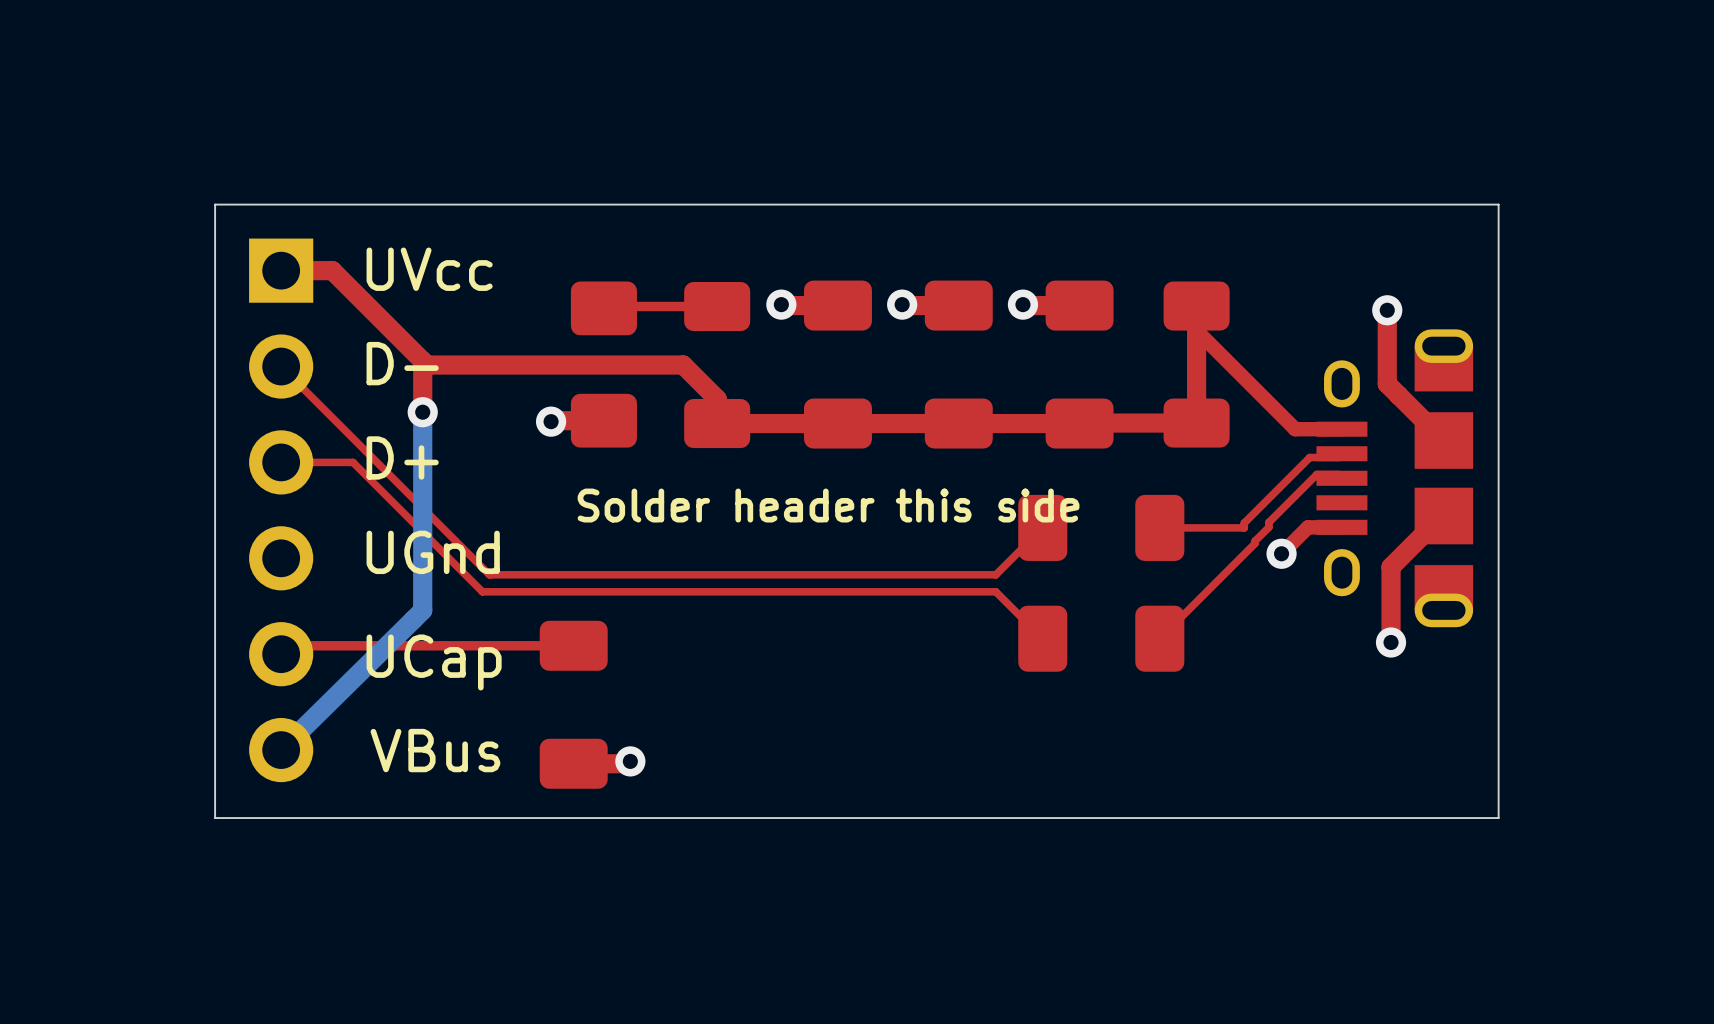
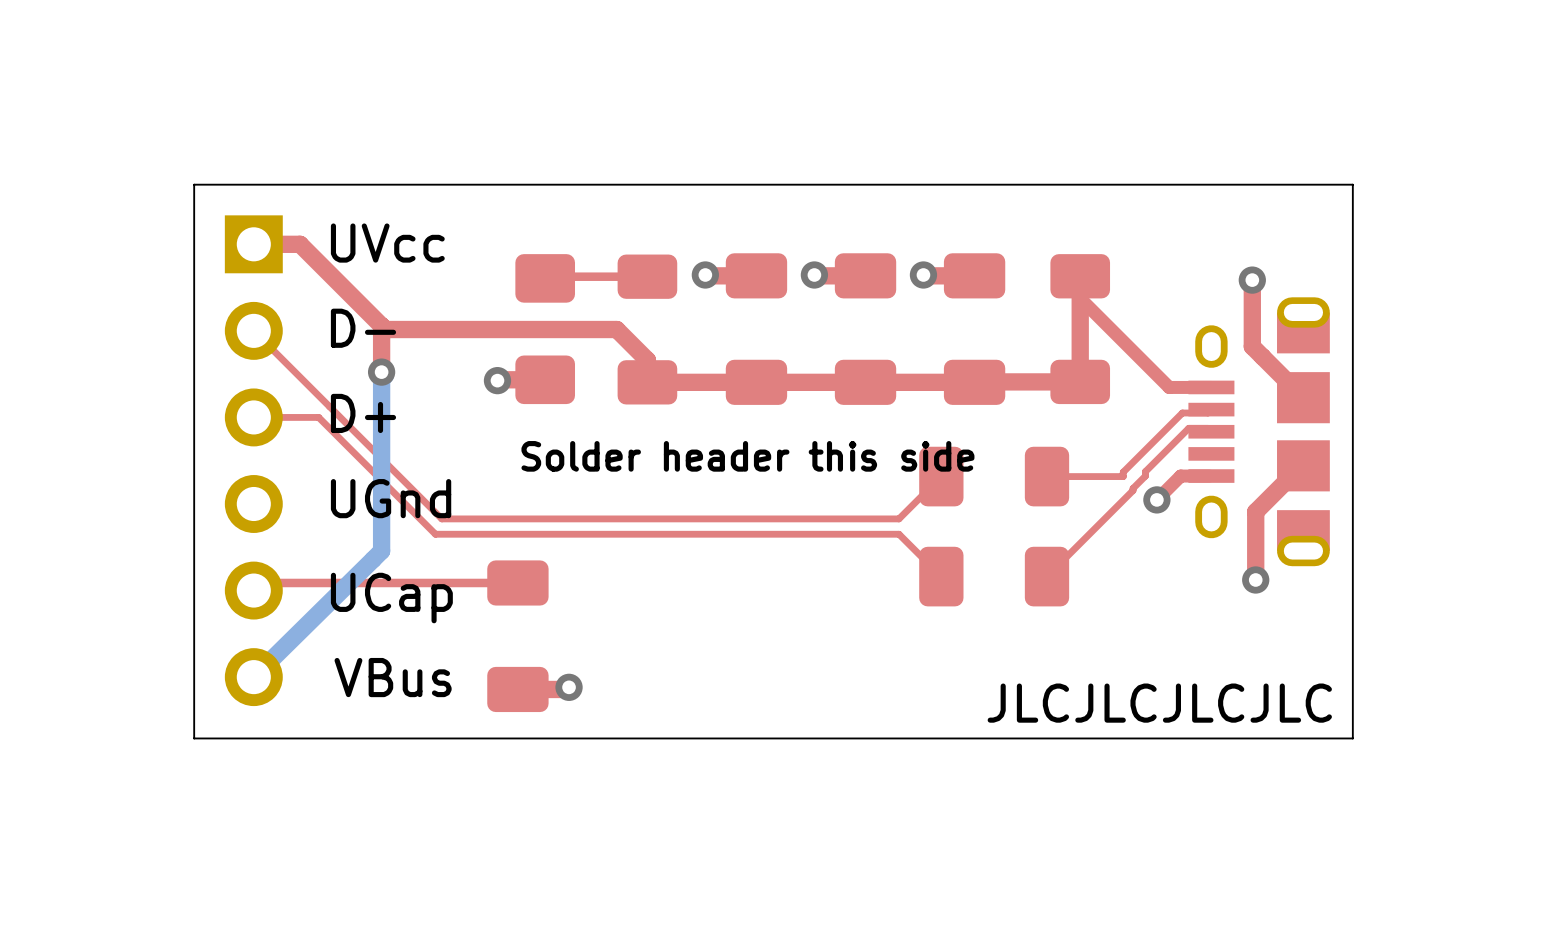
text: none -> JLCJLCJLCJLC (1159, 703)

